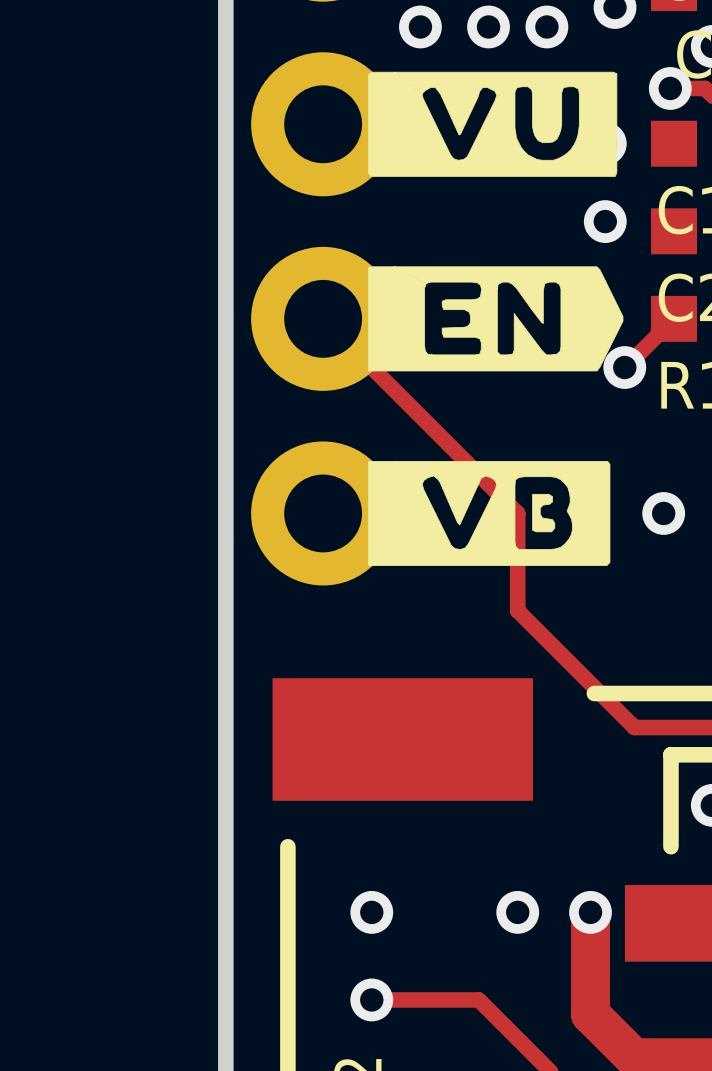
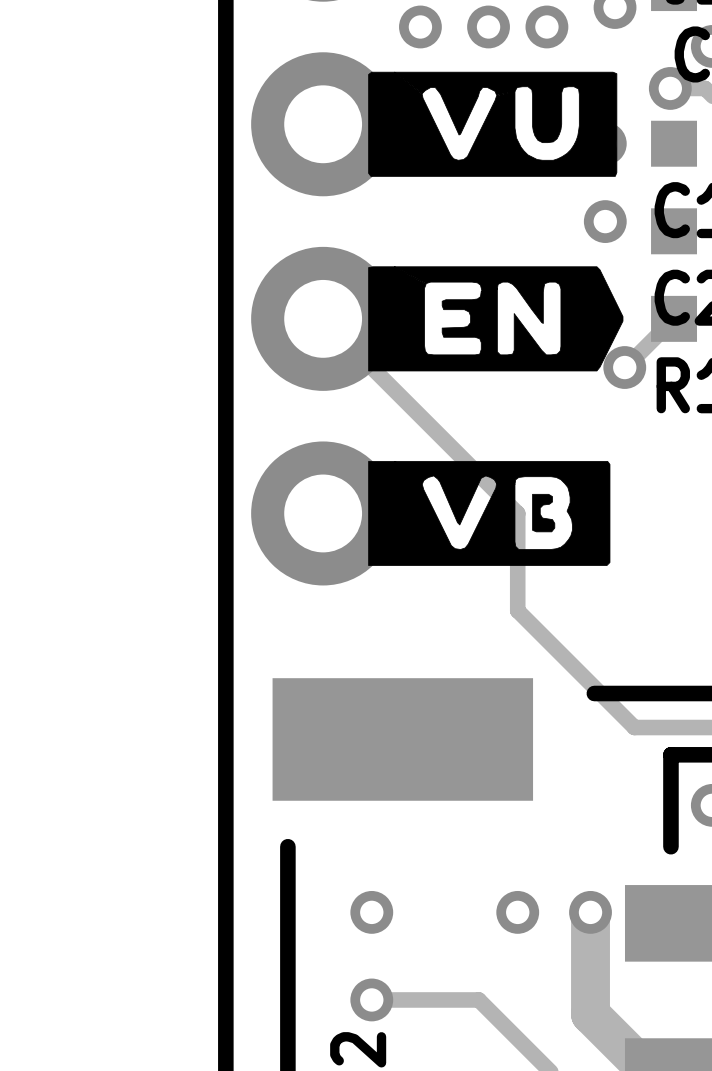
via: (663, 513) -> none

